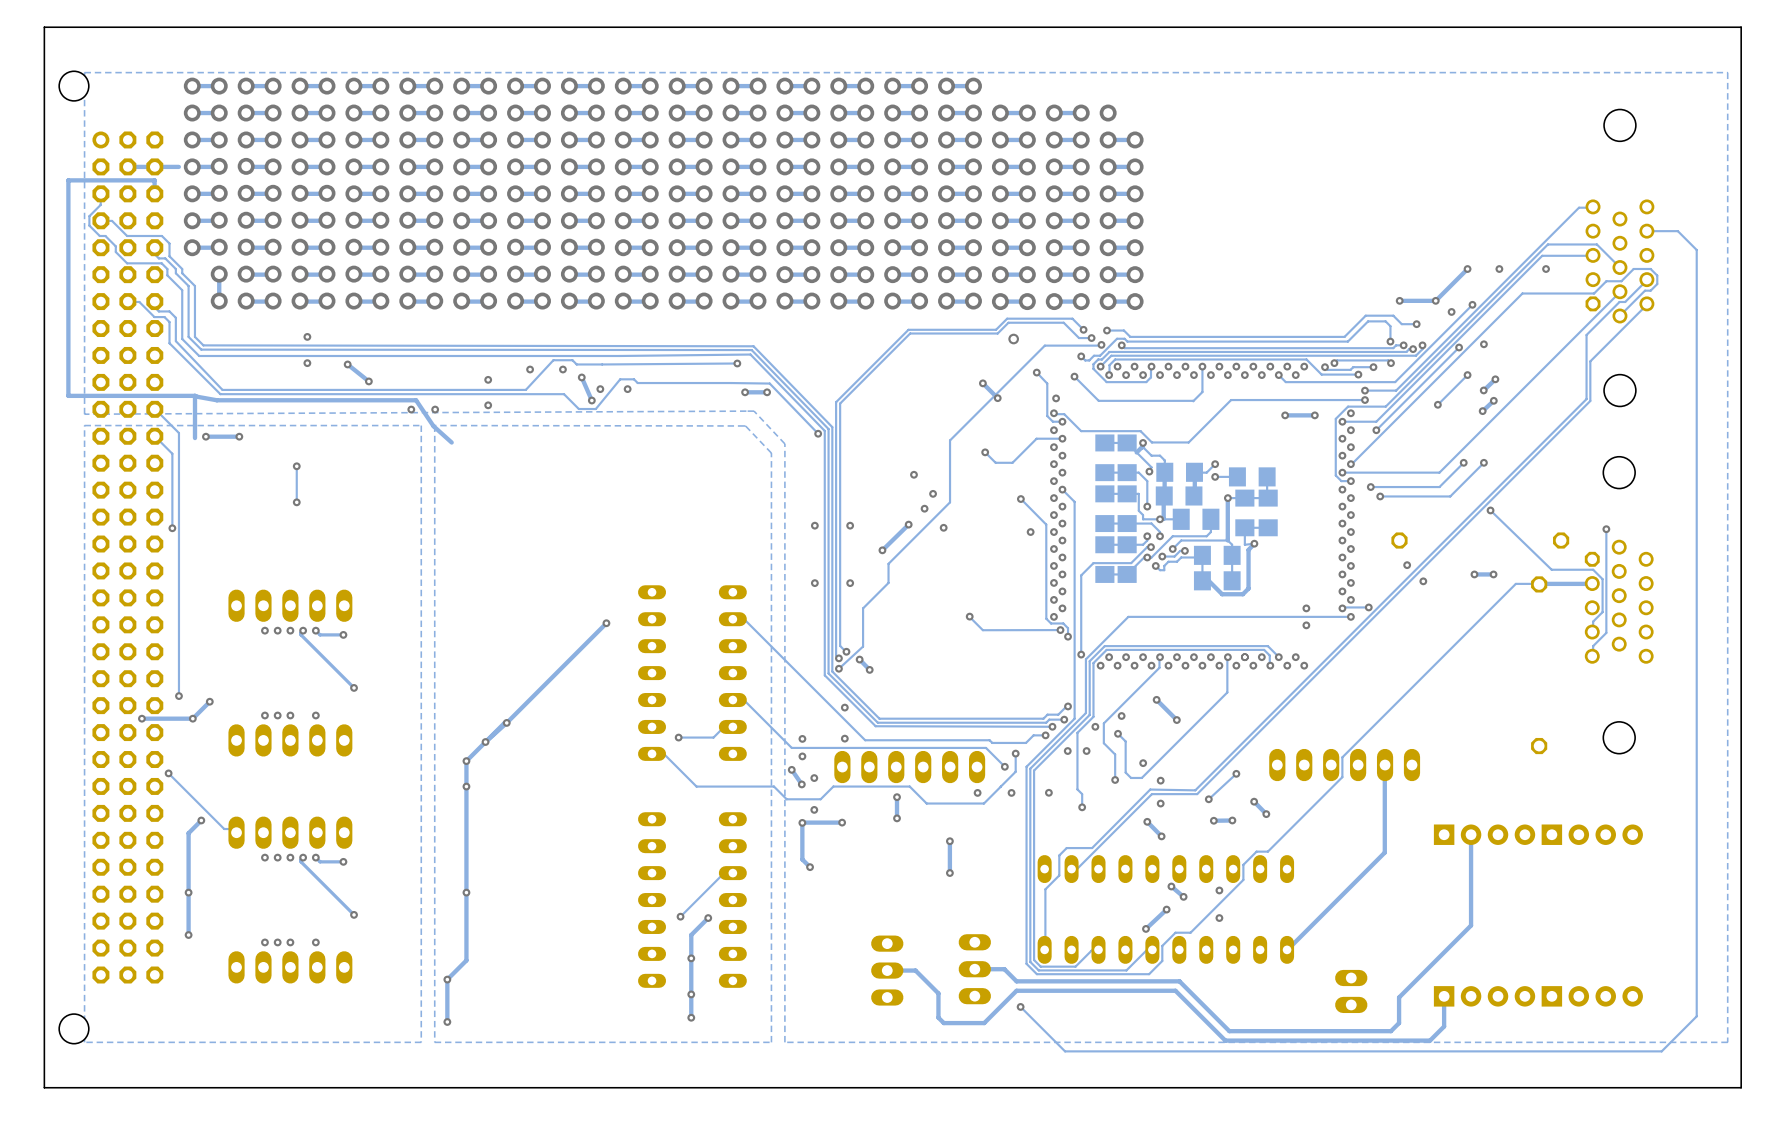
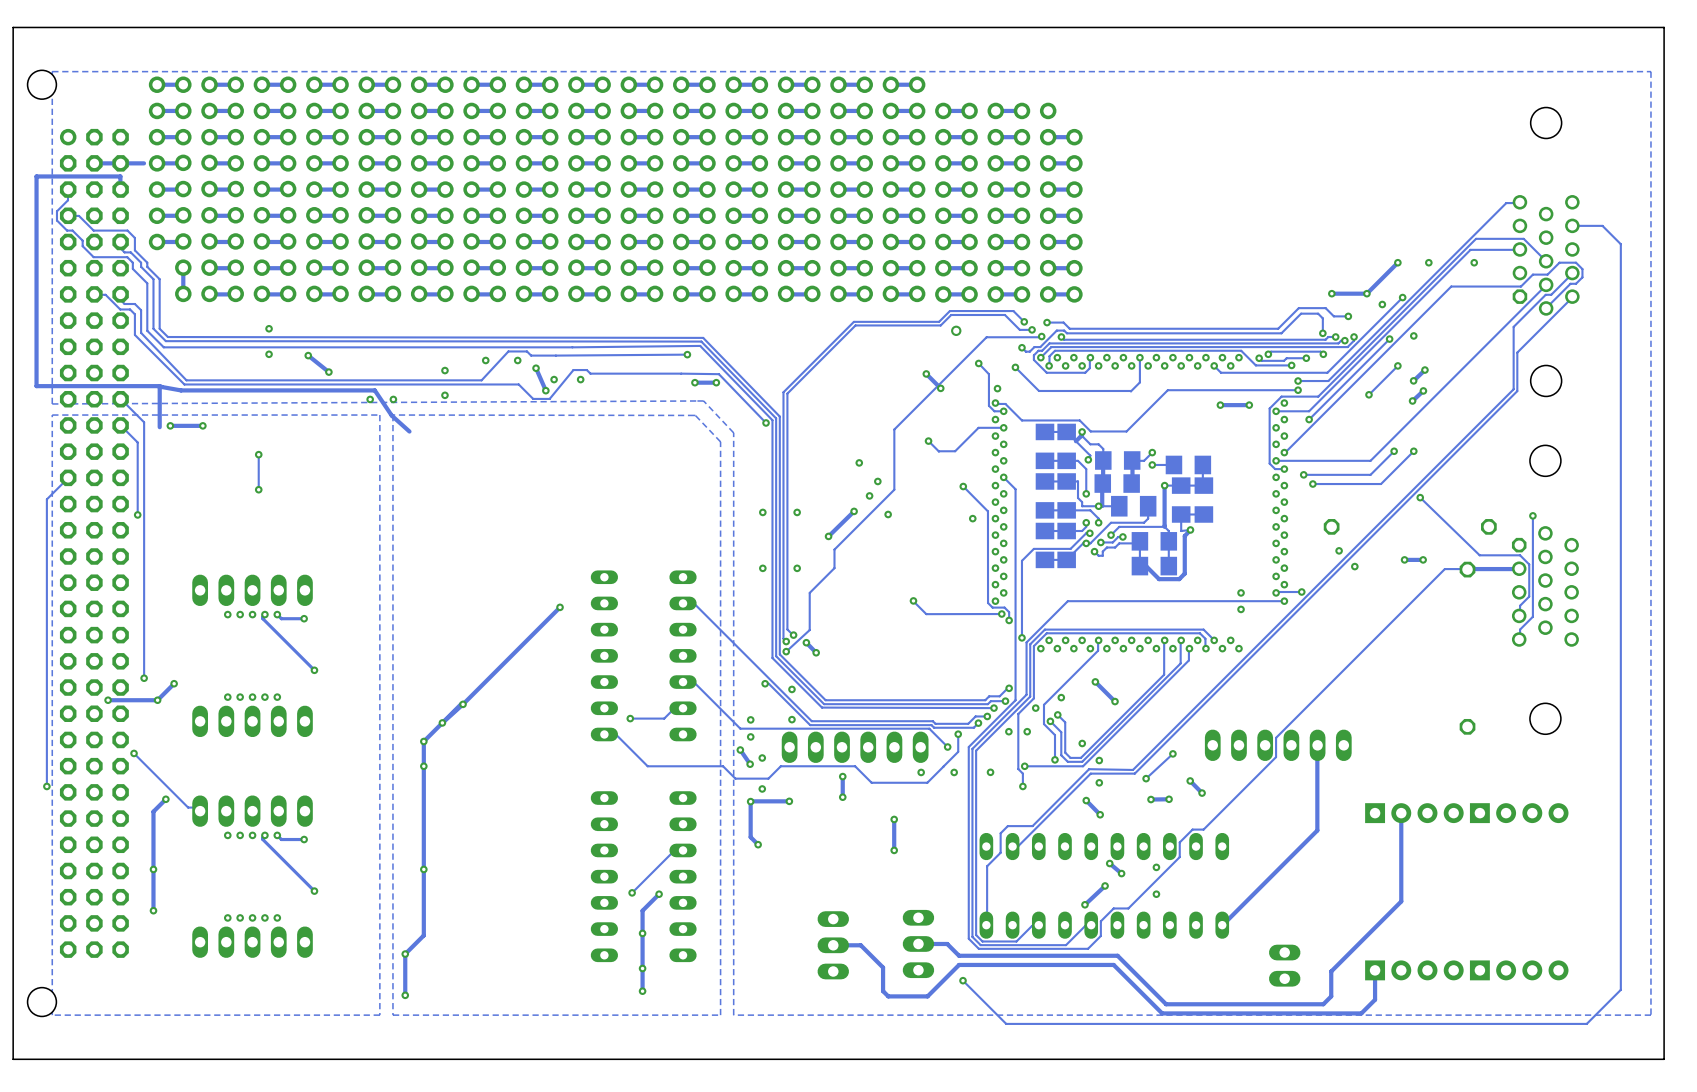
track: none -> (68, 477) (46, 499) (46, 786)
track: none -> (1181, 640) (1180, 663) (1082, 761) (1067, 761) (1061, 755) (1061, 732) (1050, 721)
track: none -> (1189, 648) (1188, 660) (1083, 766) (1024, 766)
track: none -> (765, 683) (768, 683) (810, 725) (931, 725) (934, 727) (973, 727) (978, 723)
via: none -> (765, 683)
via: none -> (264, 697)
via: none -> (1050, 721)
via: none -> (978, 723)
via: none -> (1024, 766)
via: none -> (46, 786)
via: none -> (264, 917)

